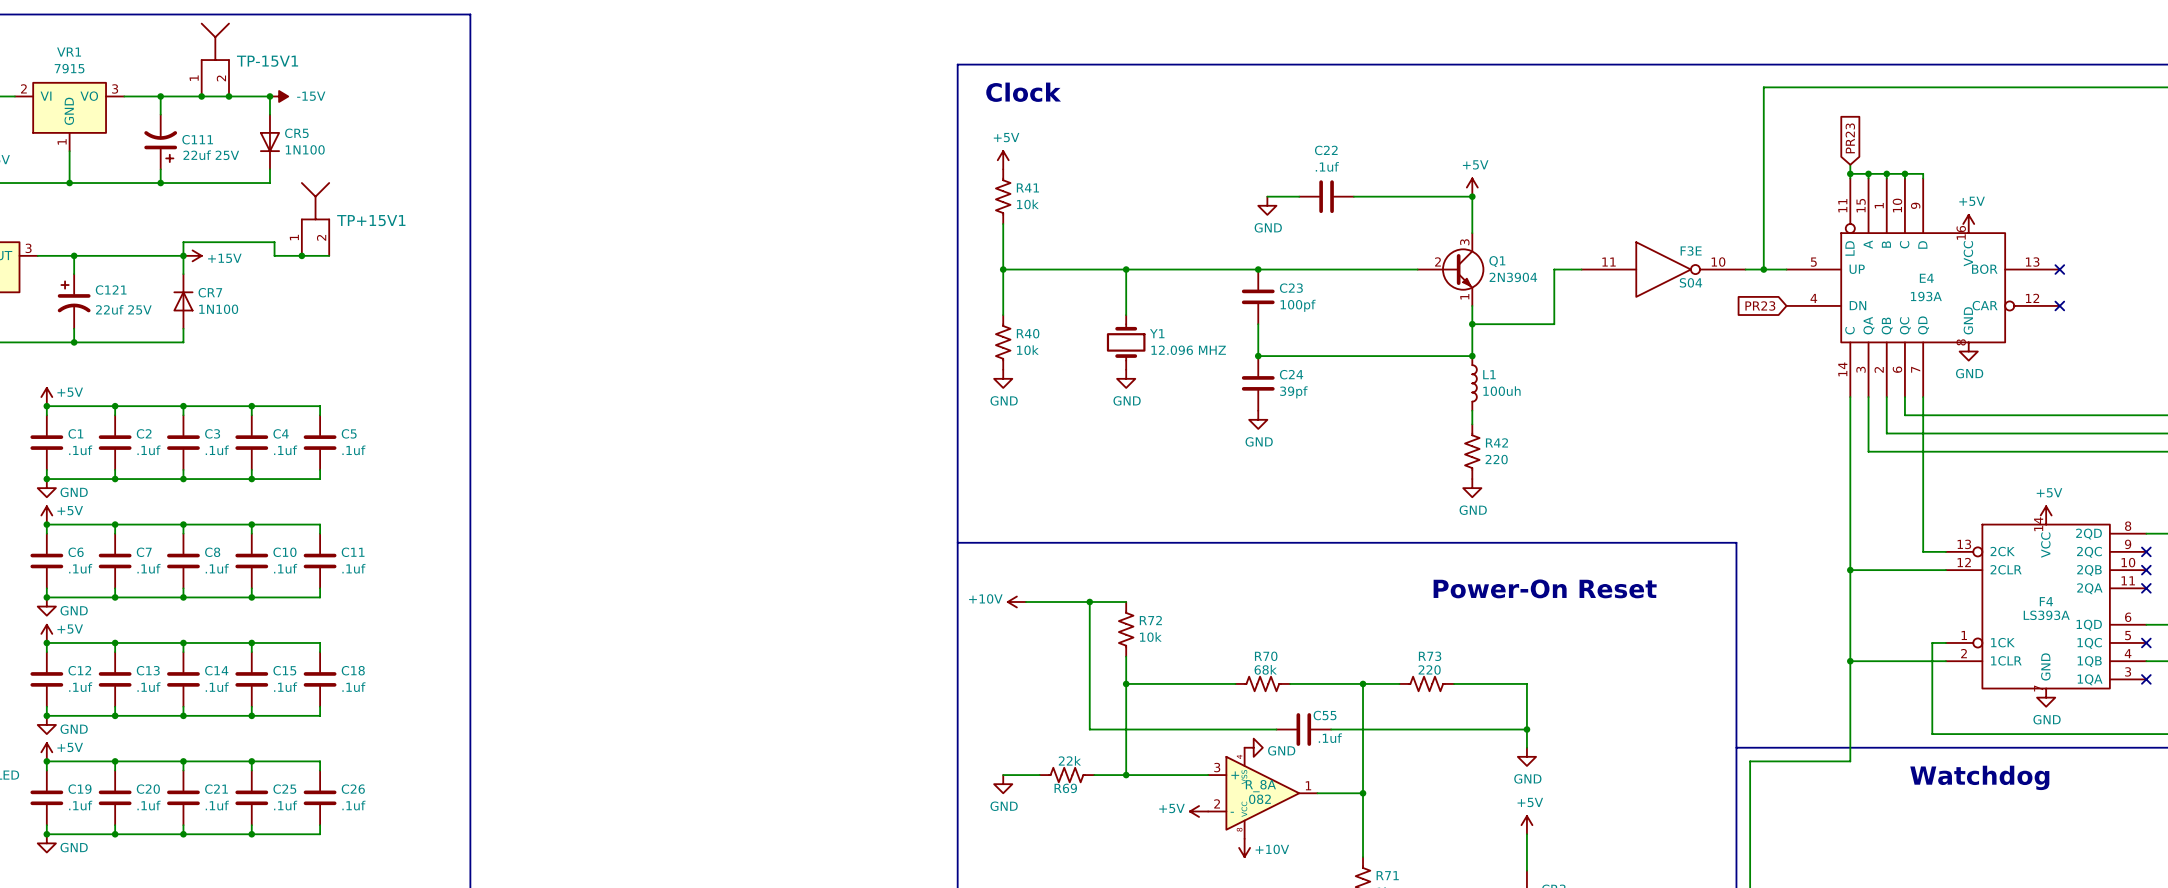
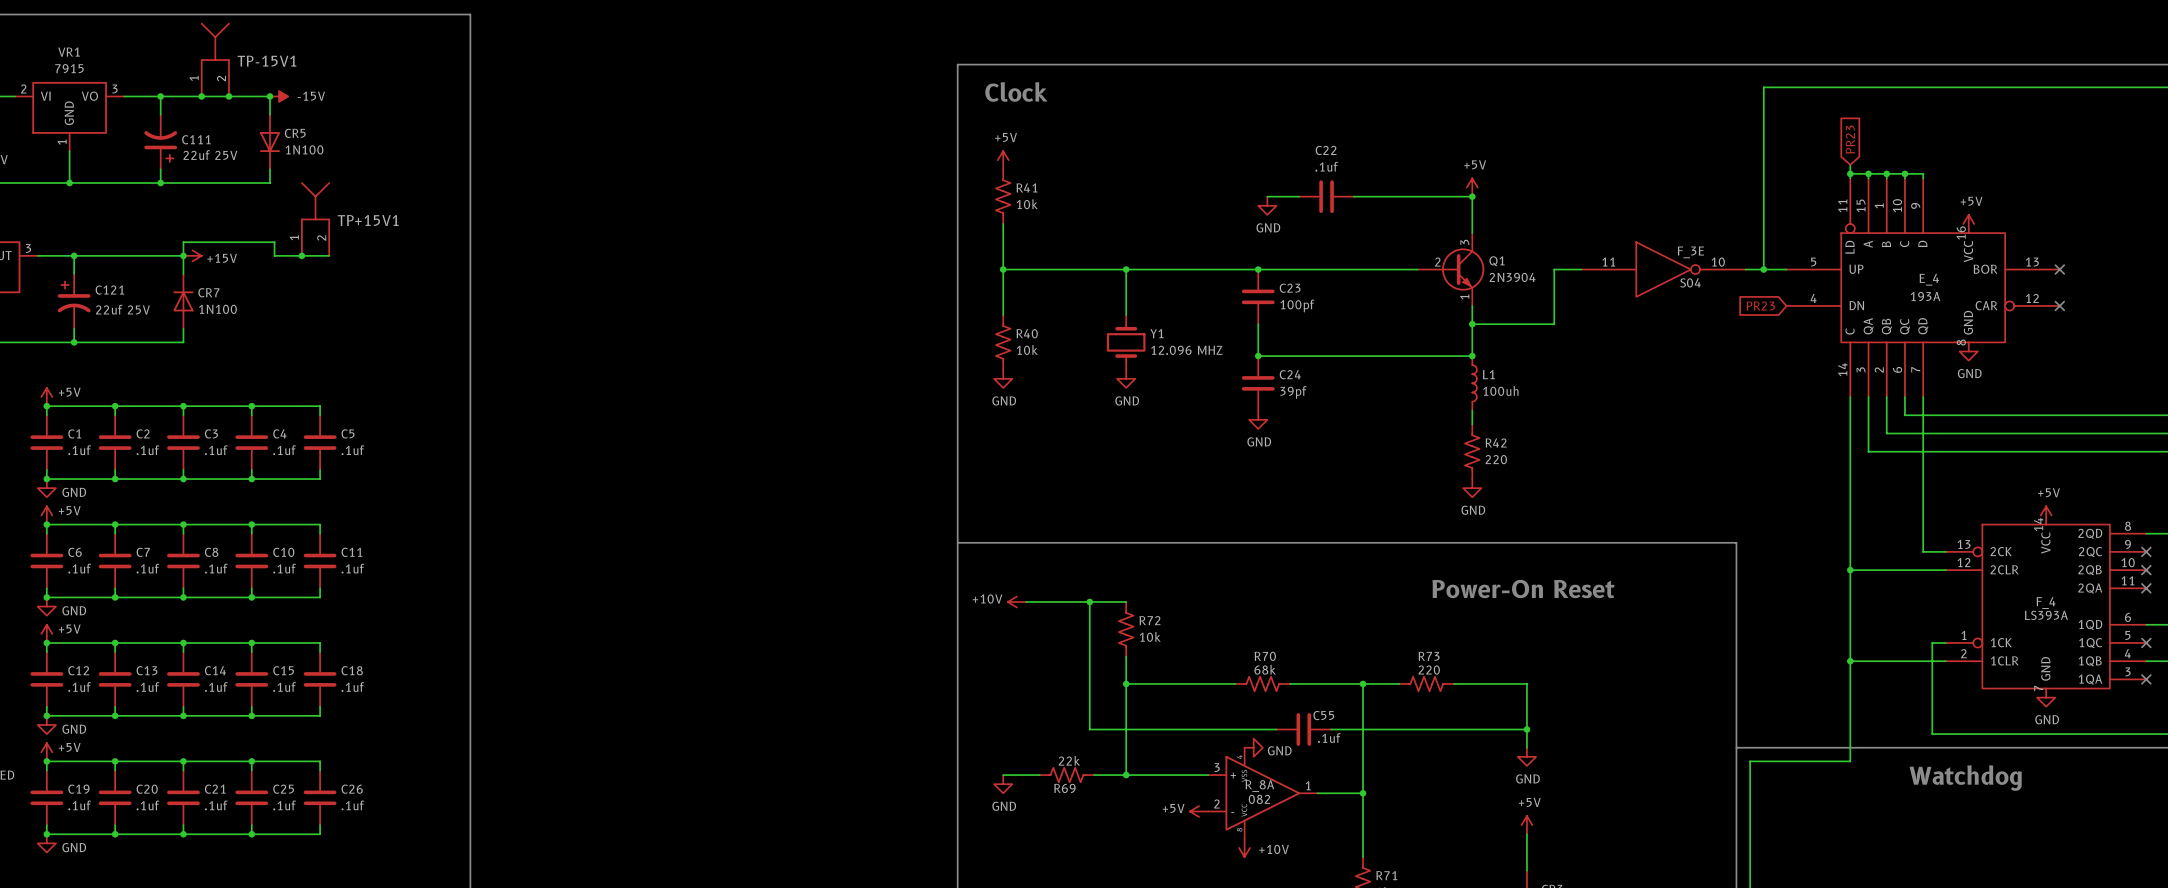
F3E name: F3E (1691, 250) -> F_3E (1690, 252)
E4 name: E4 (1926, 278) -> E_4 (1929, 279)
F4 name: F4 (2046, 601) -> F_4 (2046, 603)

